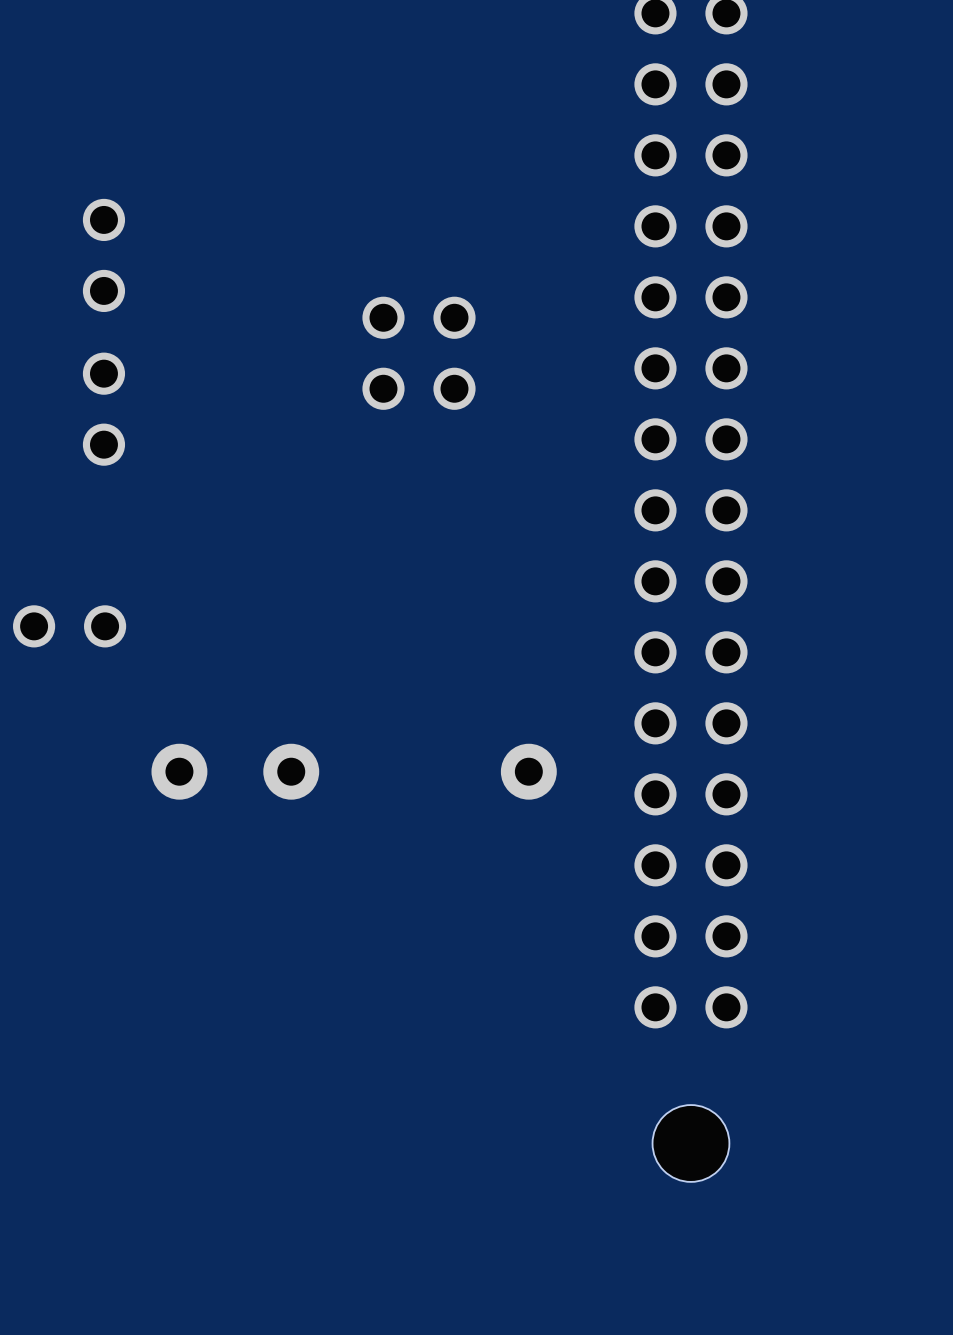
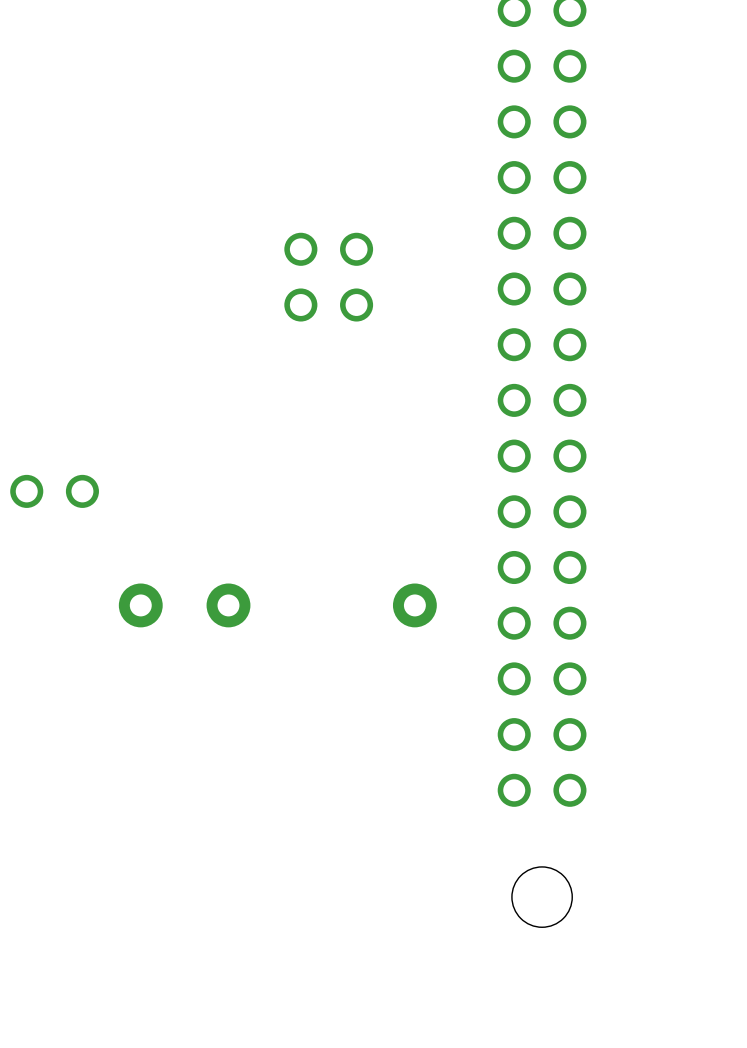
part: (103, 219) -> none
part: (103, 290) -> none
part: (103, 373) -> none
part: (103, 444) -> none

